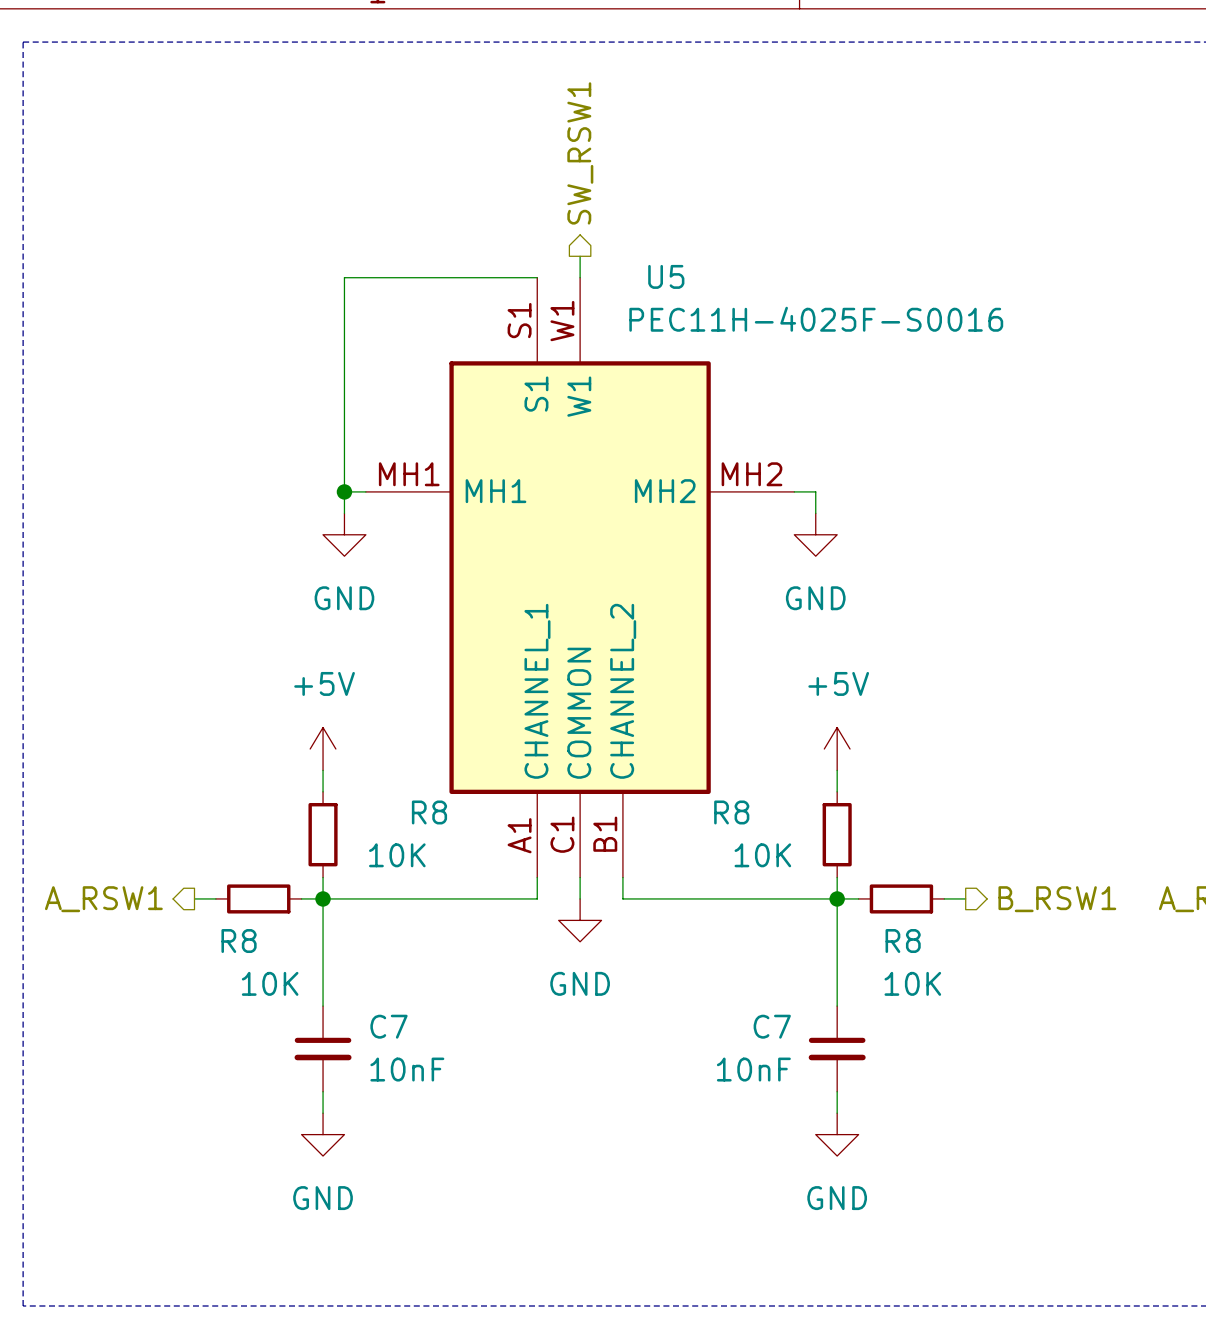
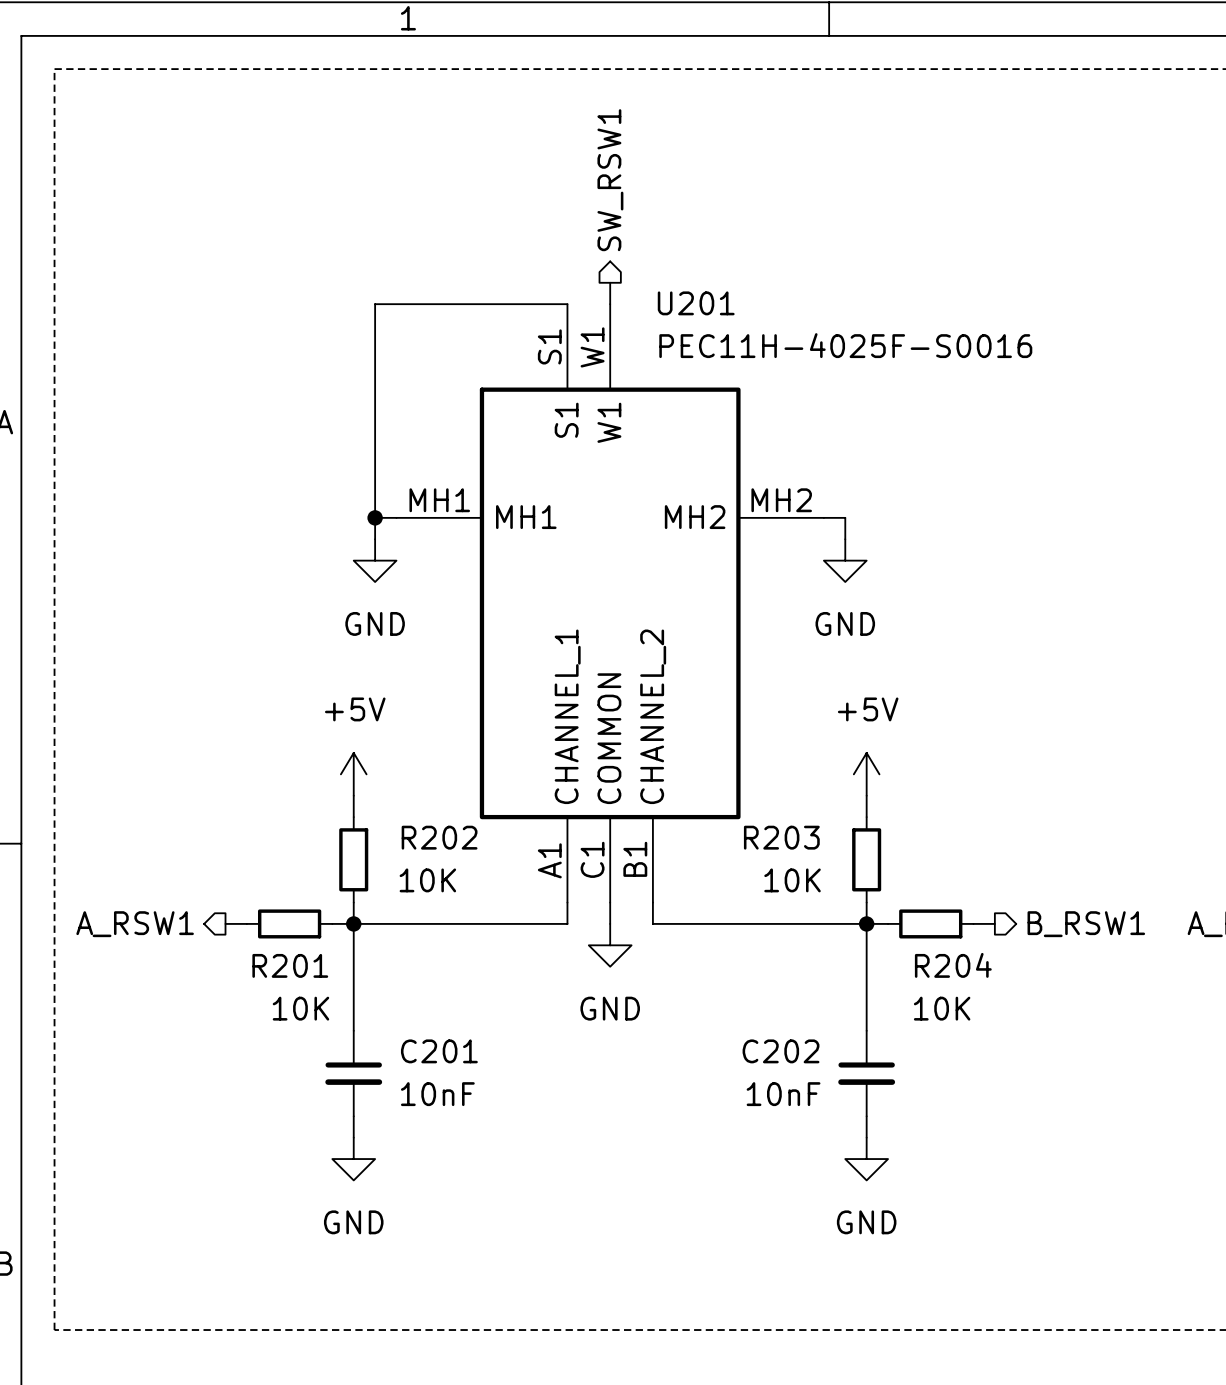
U5 name: U5 (666, 276) -> U201 (696, 303)
R8 name: R8 (429, 812) -> R202 (439, 837)
R8 name: R8 (731, 812) -> R203 (781, 837)
R8 name: R8 (239, 941) -> R201 (290, 965)
R8 name: R8 (903, 941) -> R204 (953, 965)
C7 name: C7 (388, 1026) -> C201 (439, 1051)
C7 name: C7 (772, 1026) -> C202 (781, 1051)

